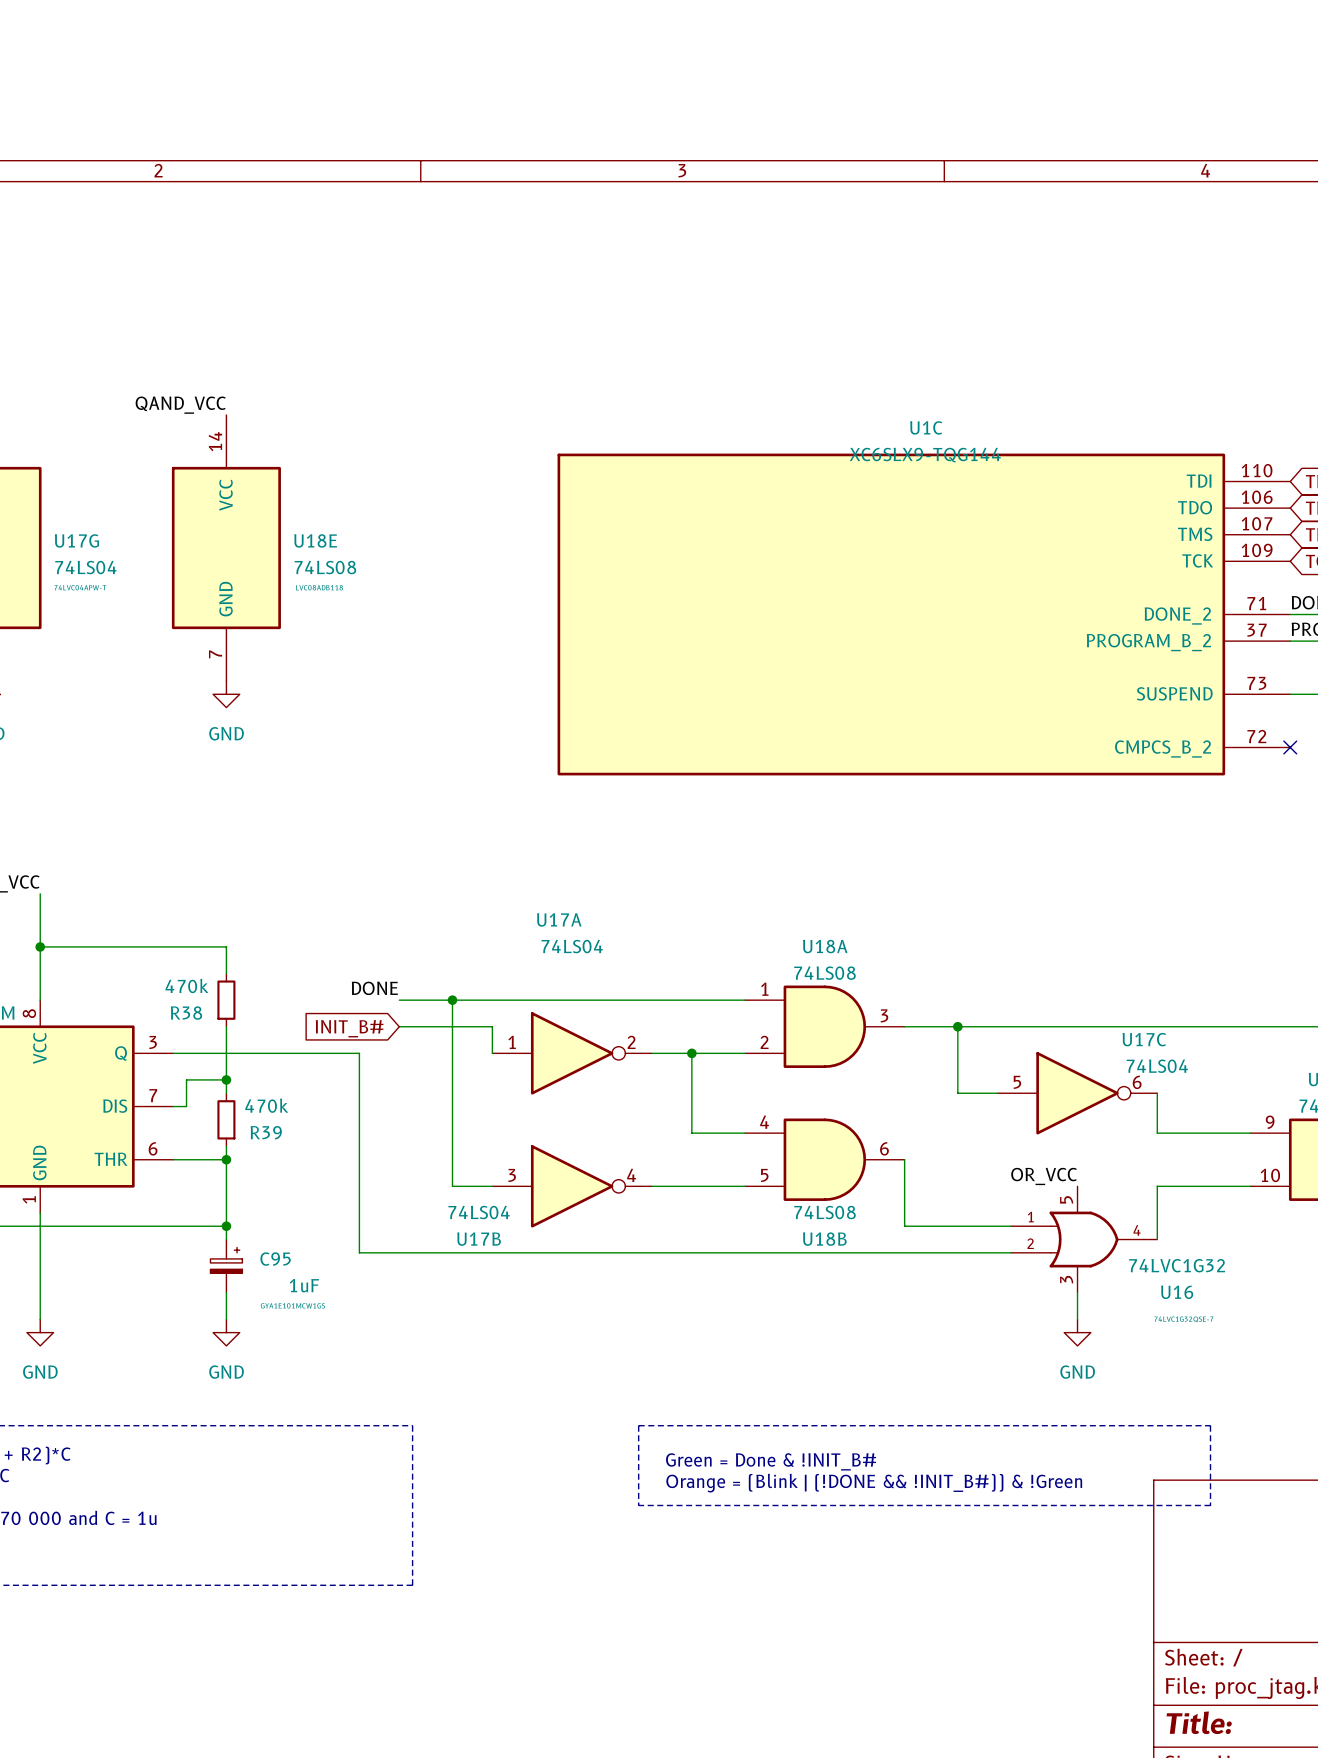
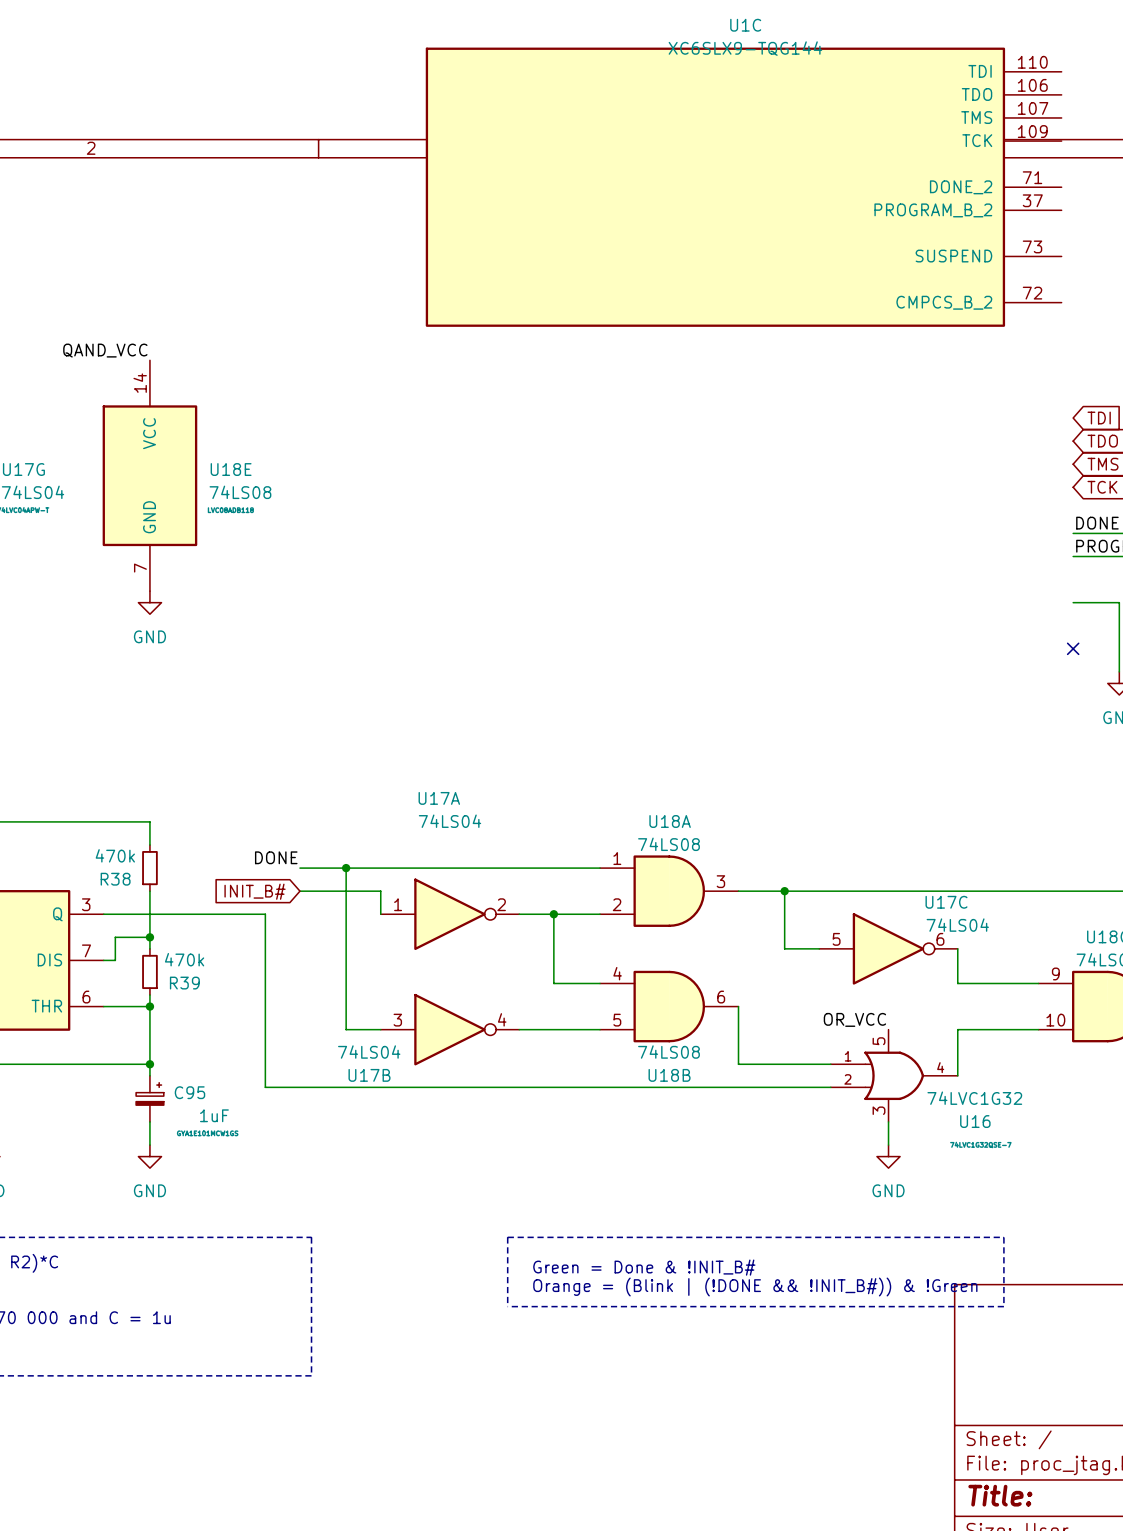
U1C position: (923, 614) -> (743, 187)

